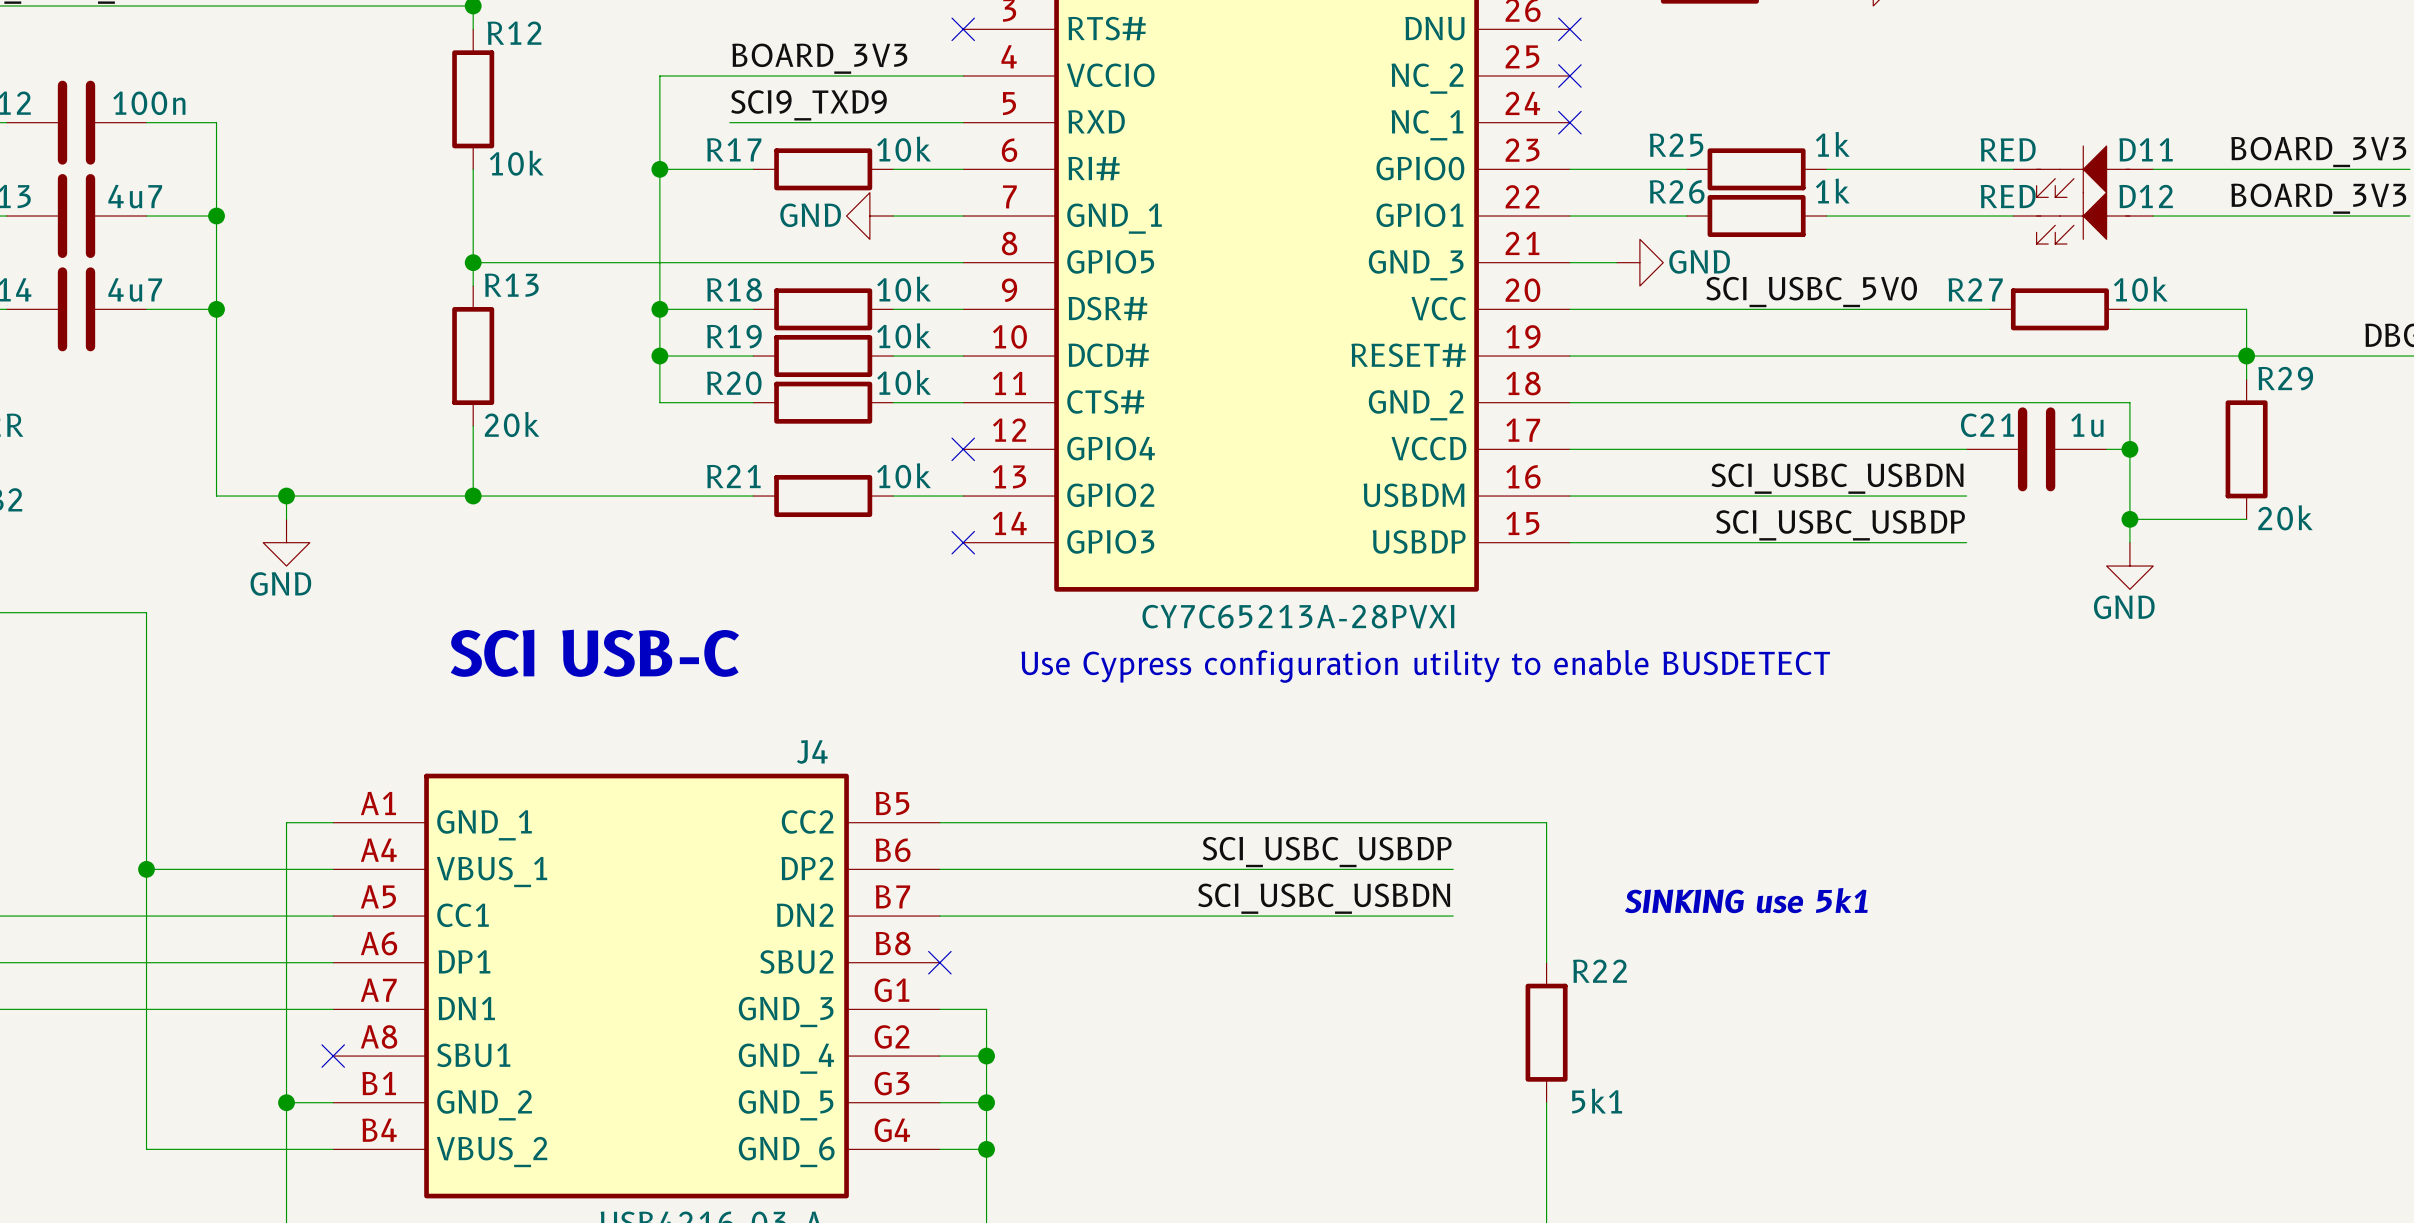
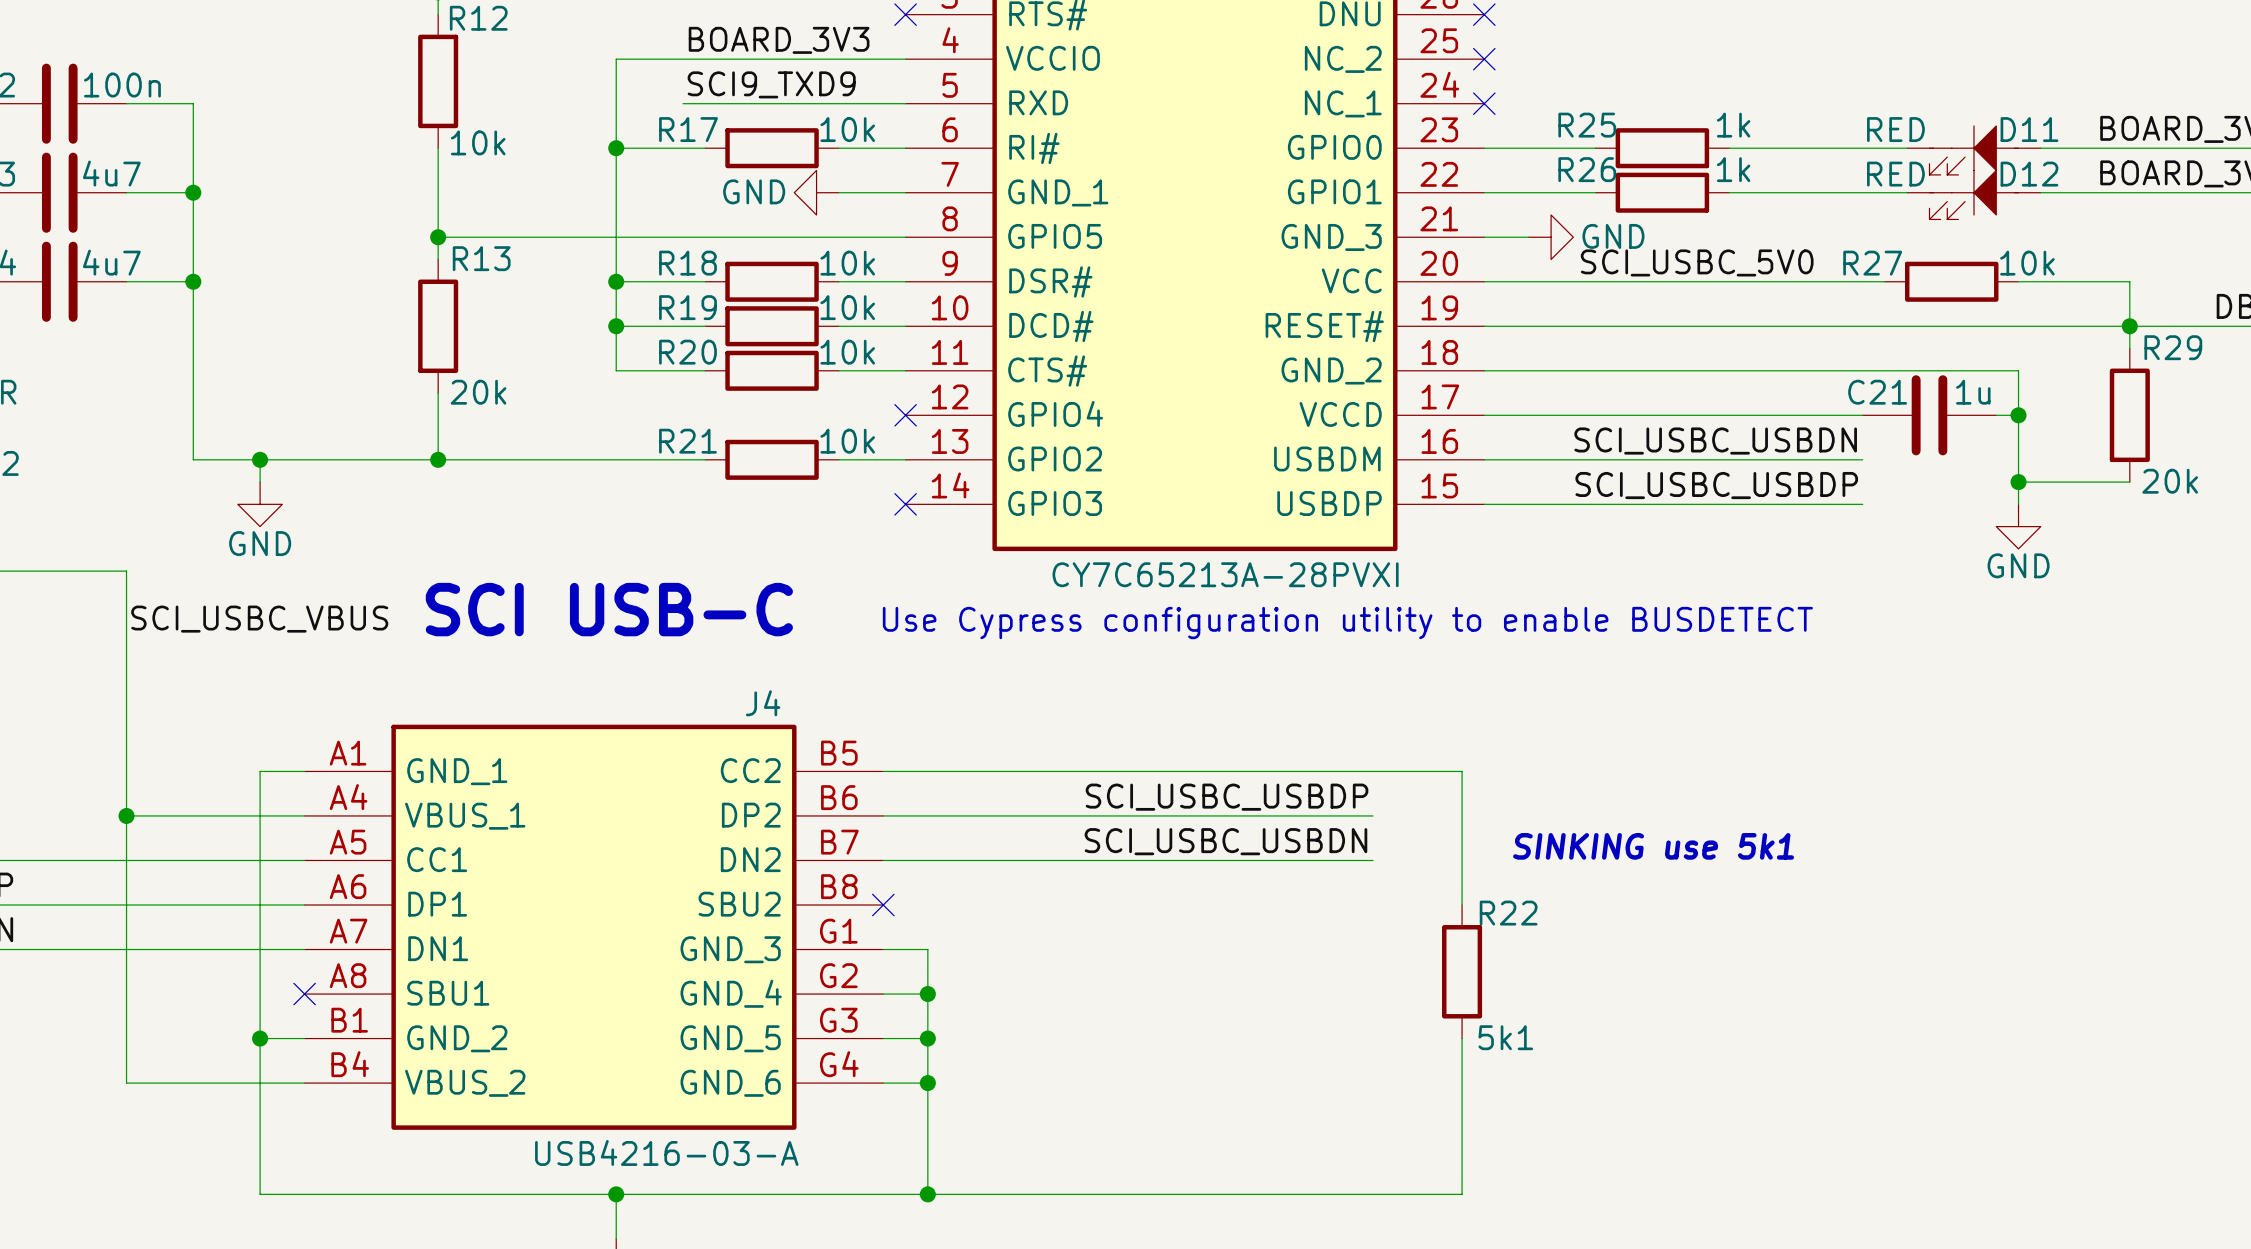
label: none -> SCI_USBC_VBUS (259, 619)

